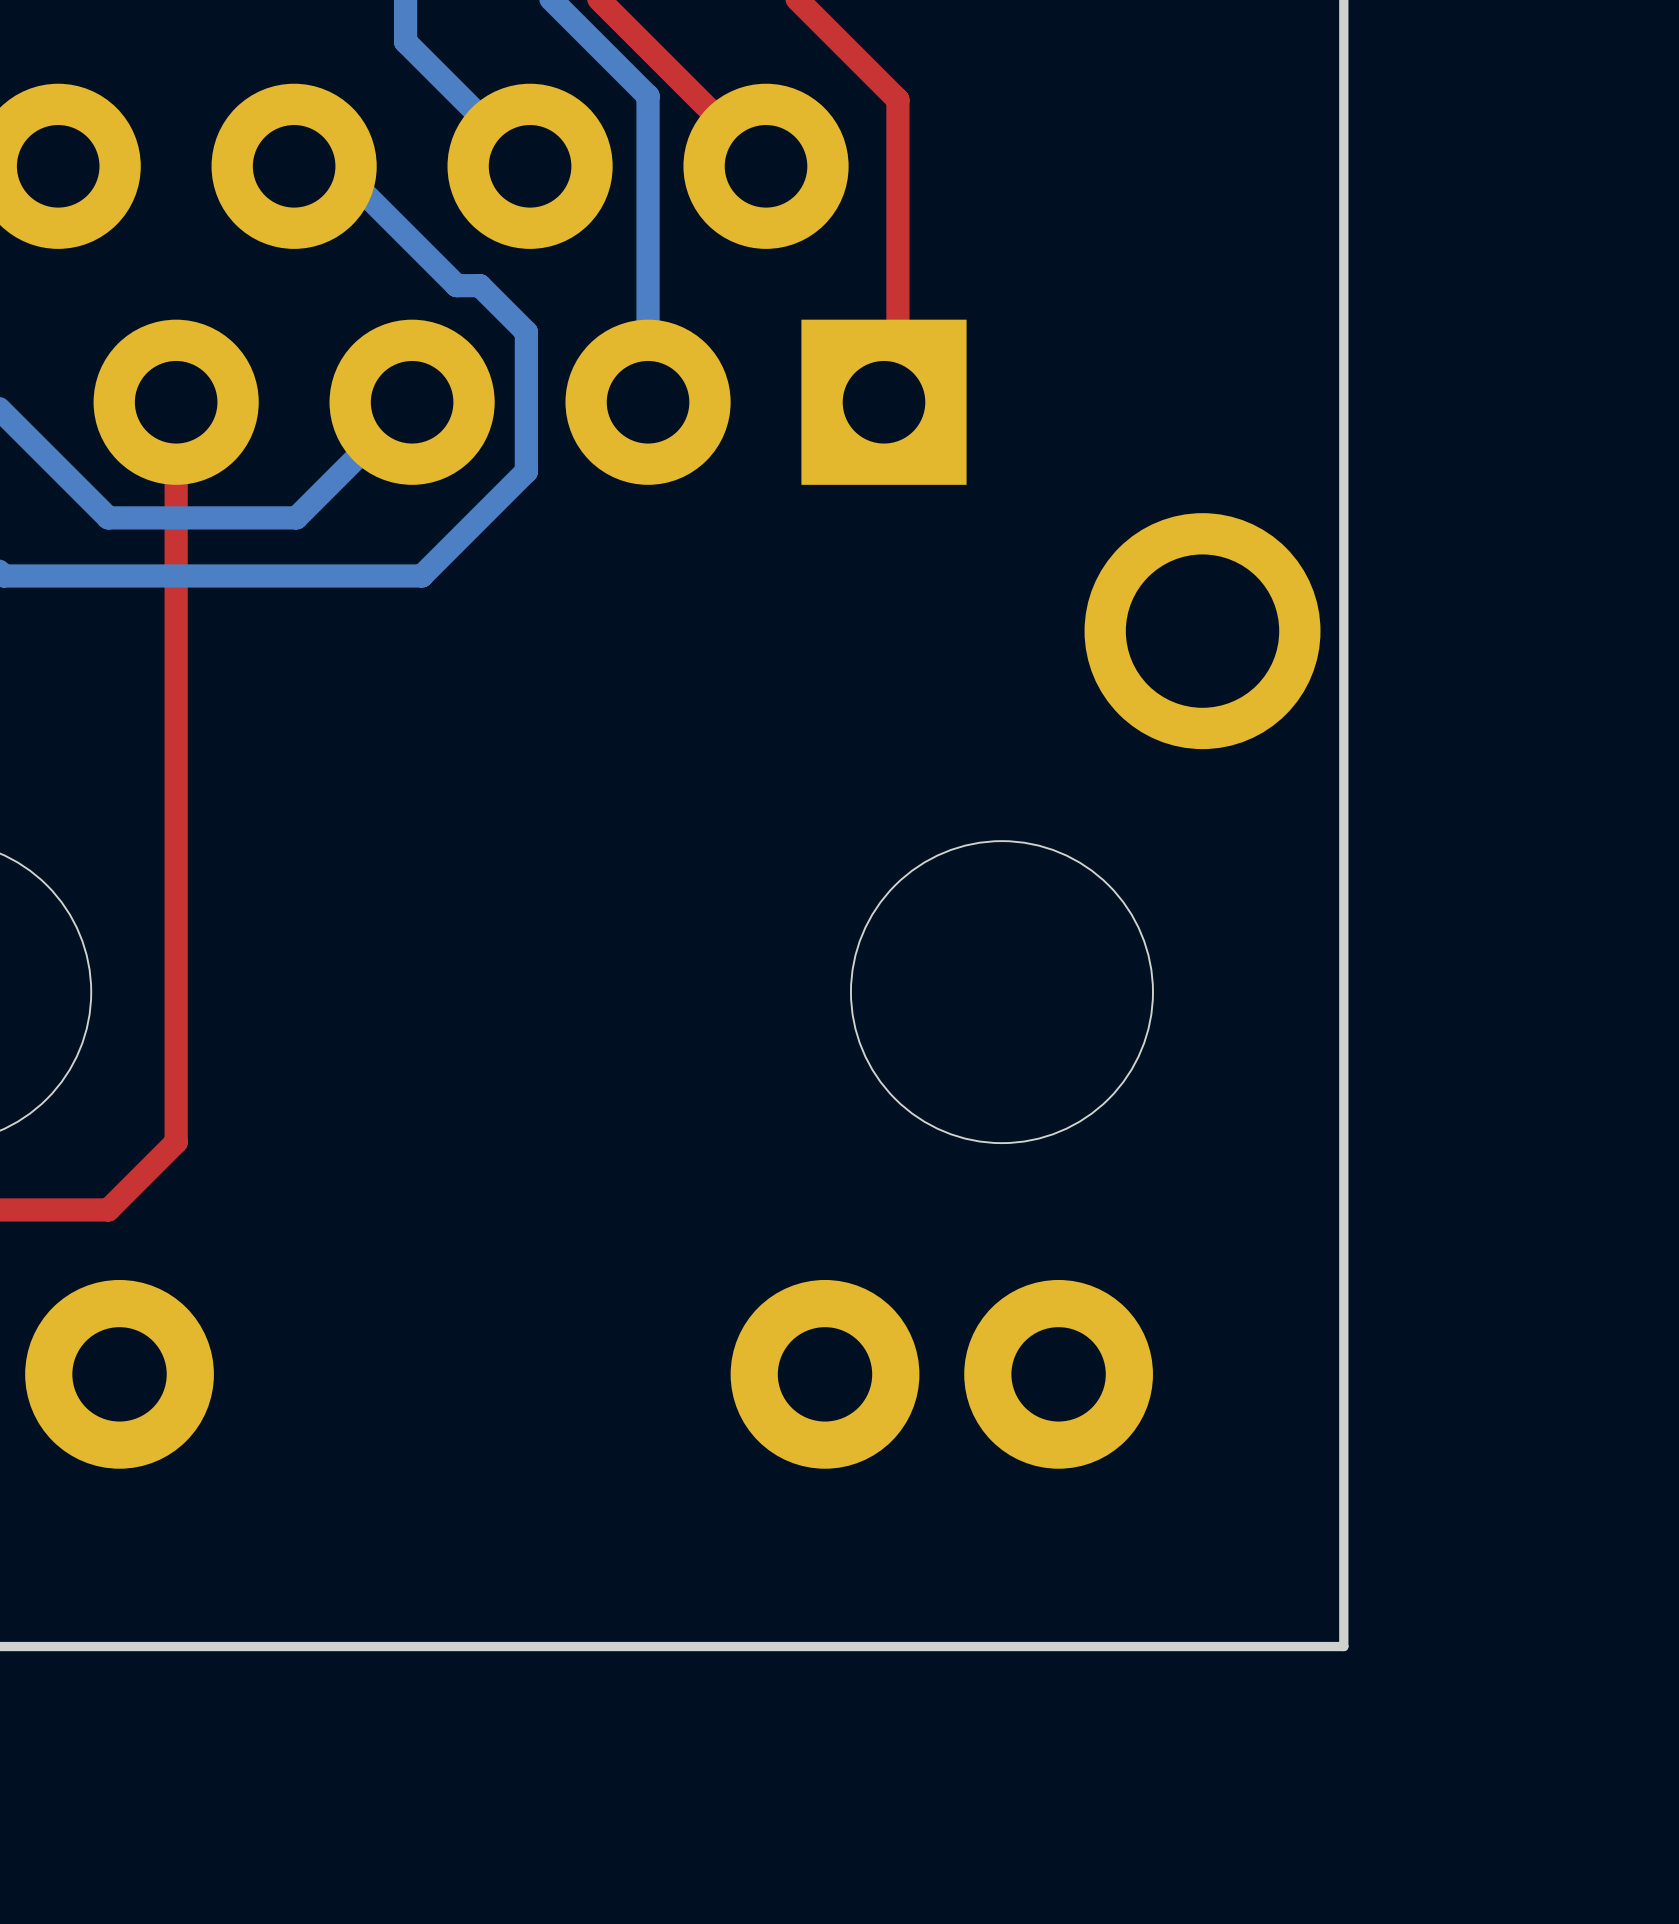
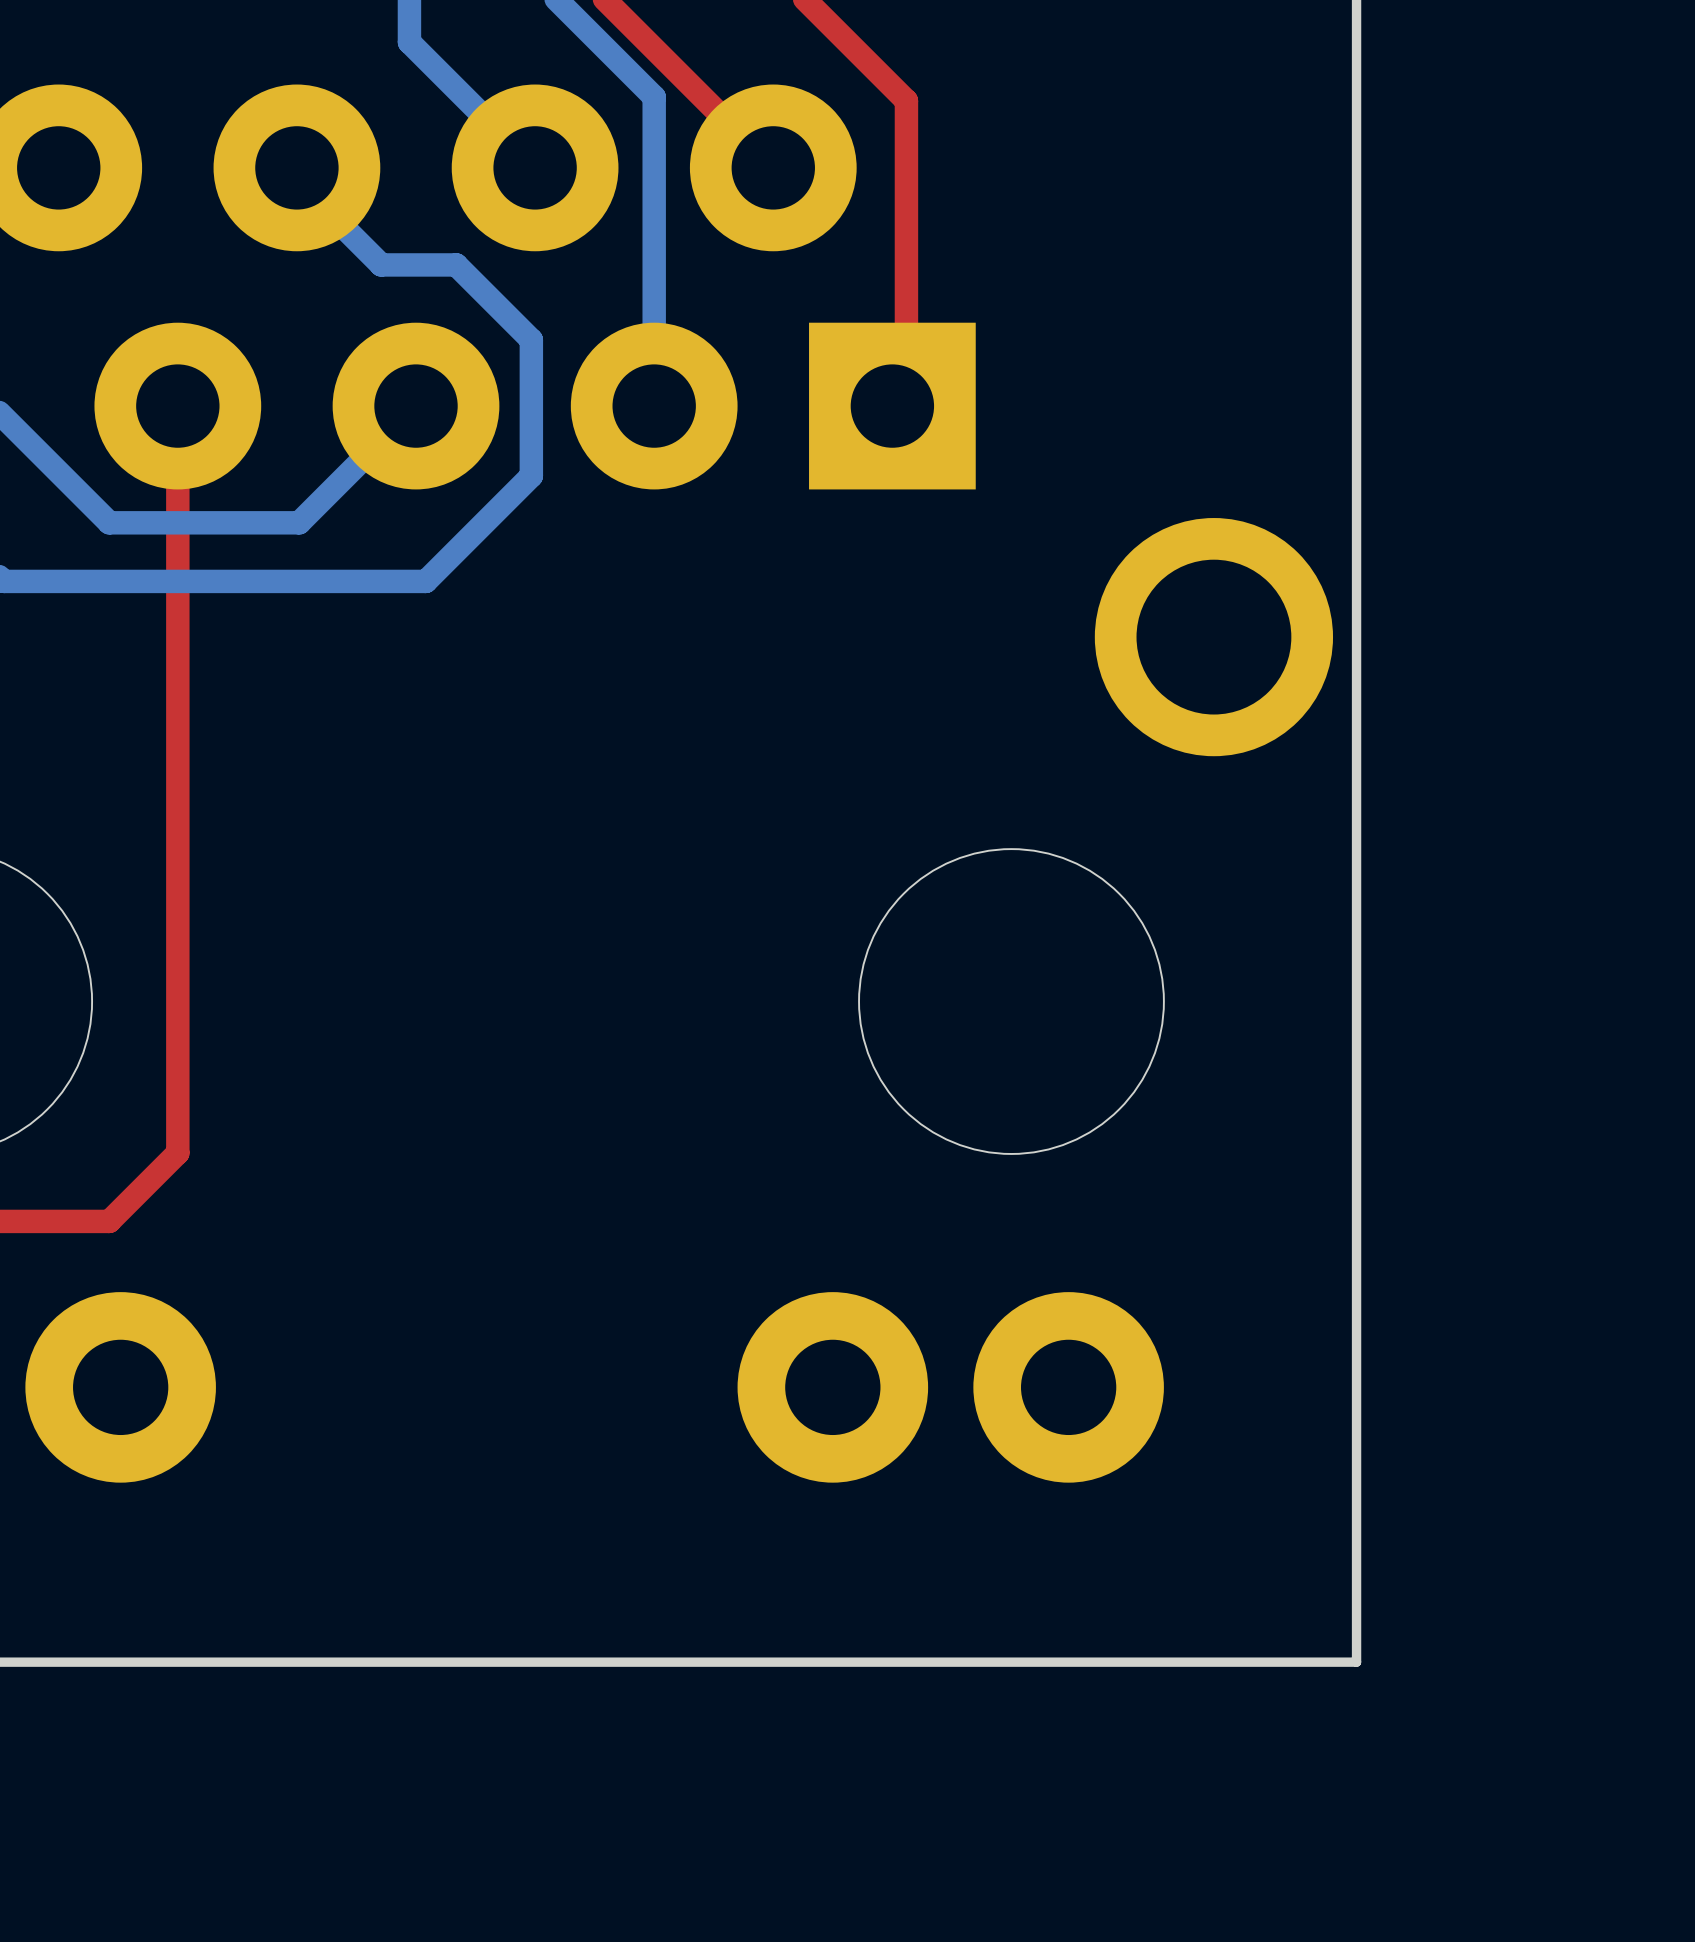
bottom track: (294, 166) (337, 166) (456, 285) (479, 285) (526, 332) (526, 336) -> (296, 180) (381, 264) (456, 264) (531, 339)

